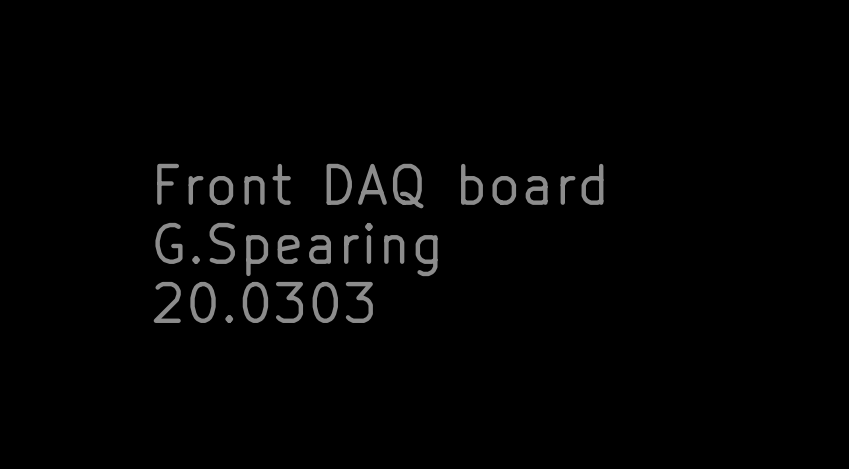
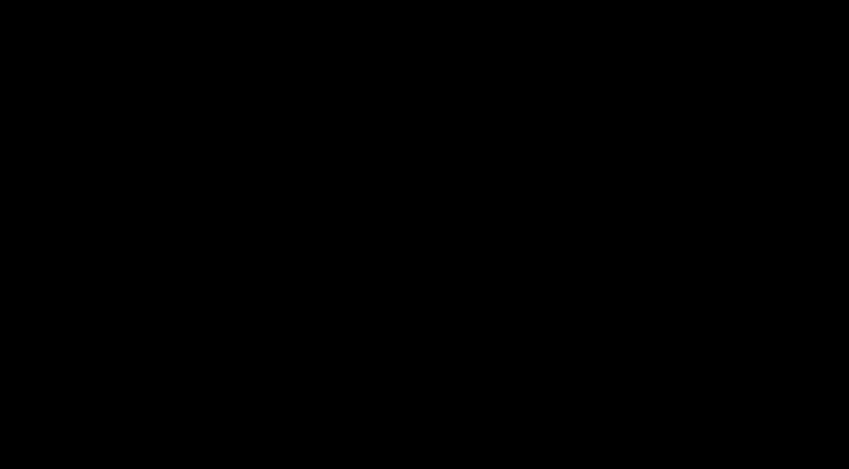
text: Front DAQ board (380, 186) -> none
text: G.Spearing (296, 249) -> none
text: 20.0303 (263, 302) -> none

